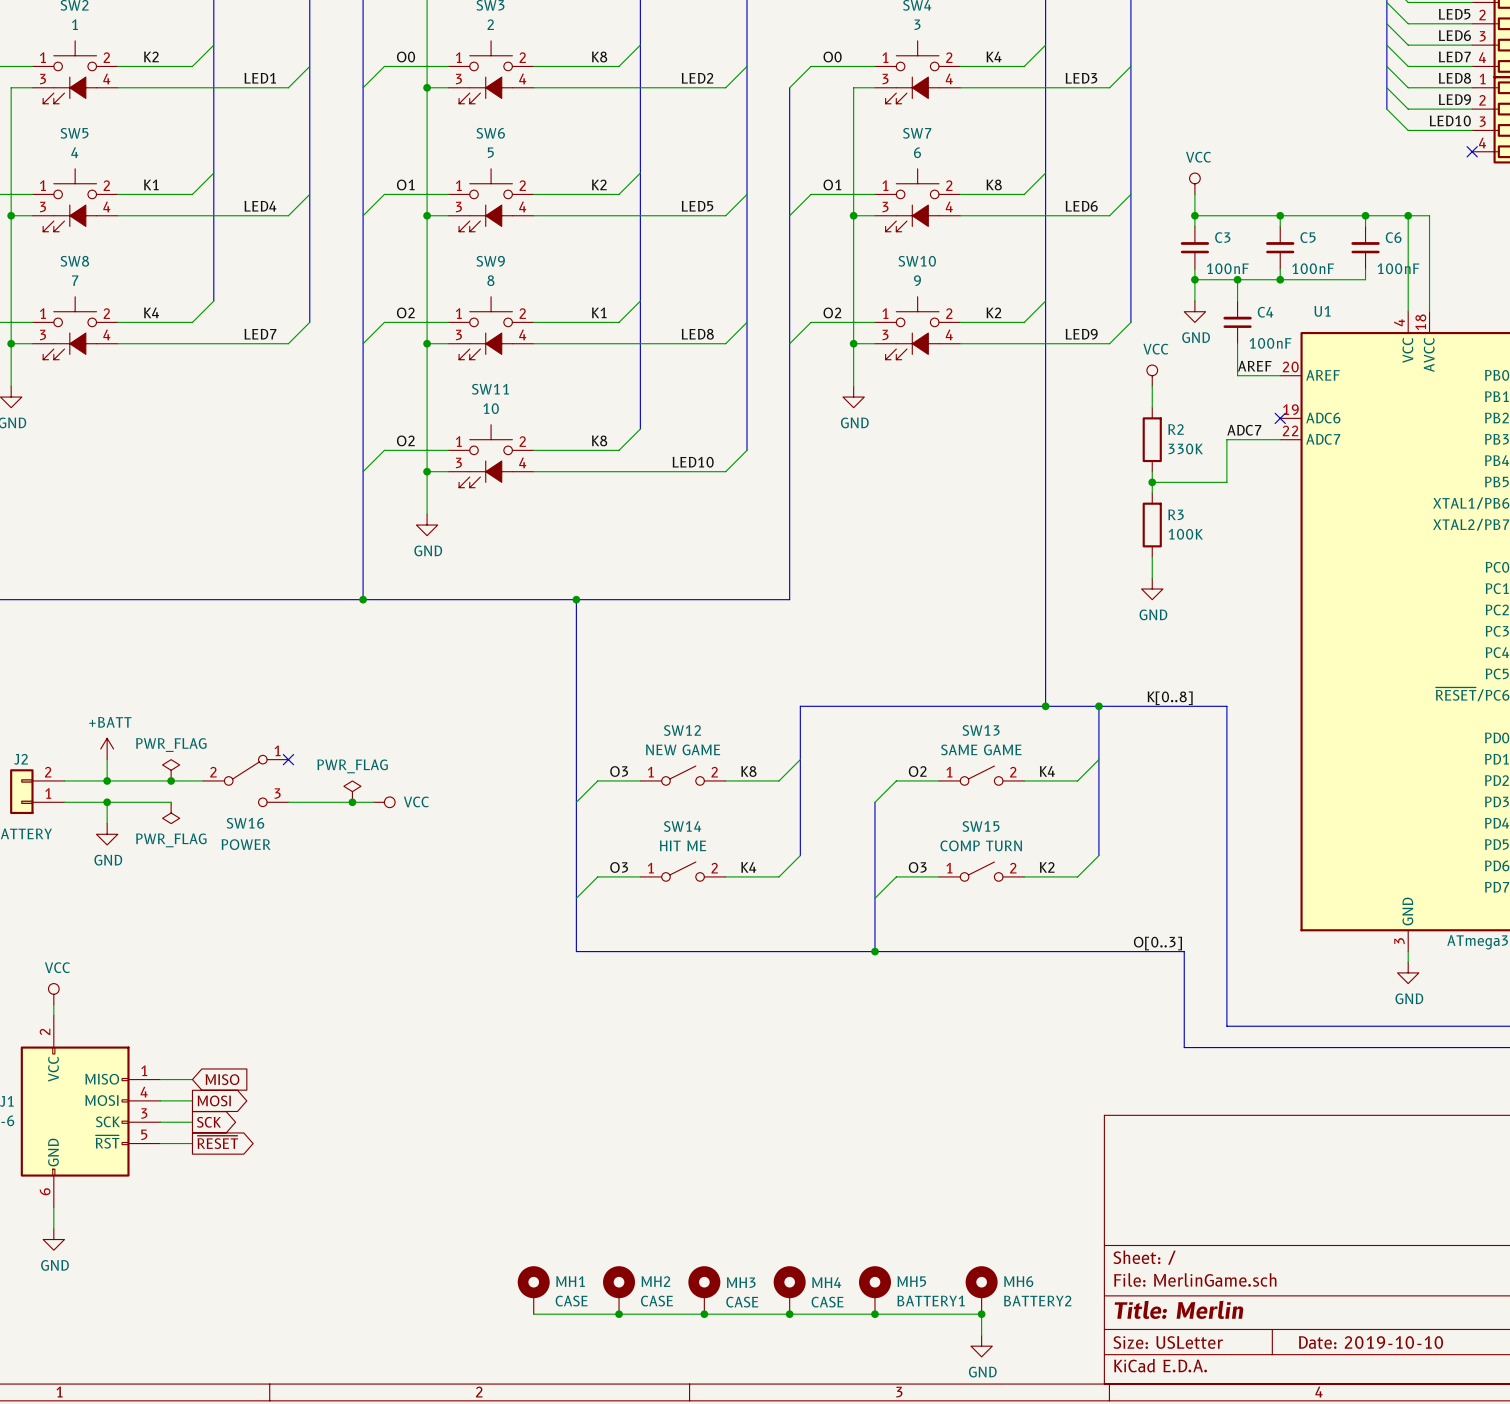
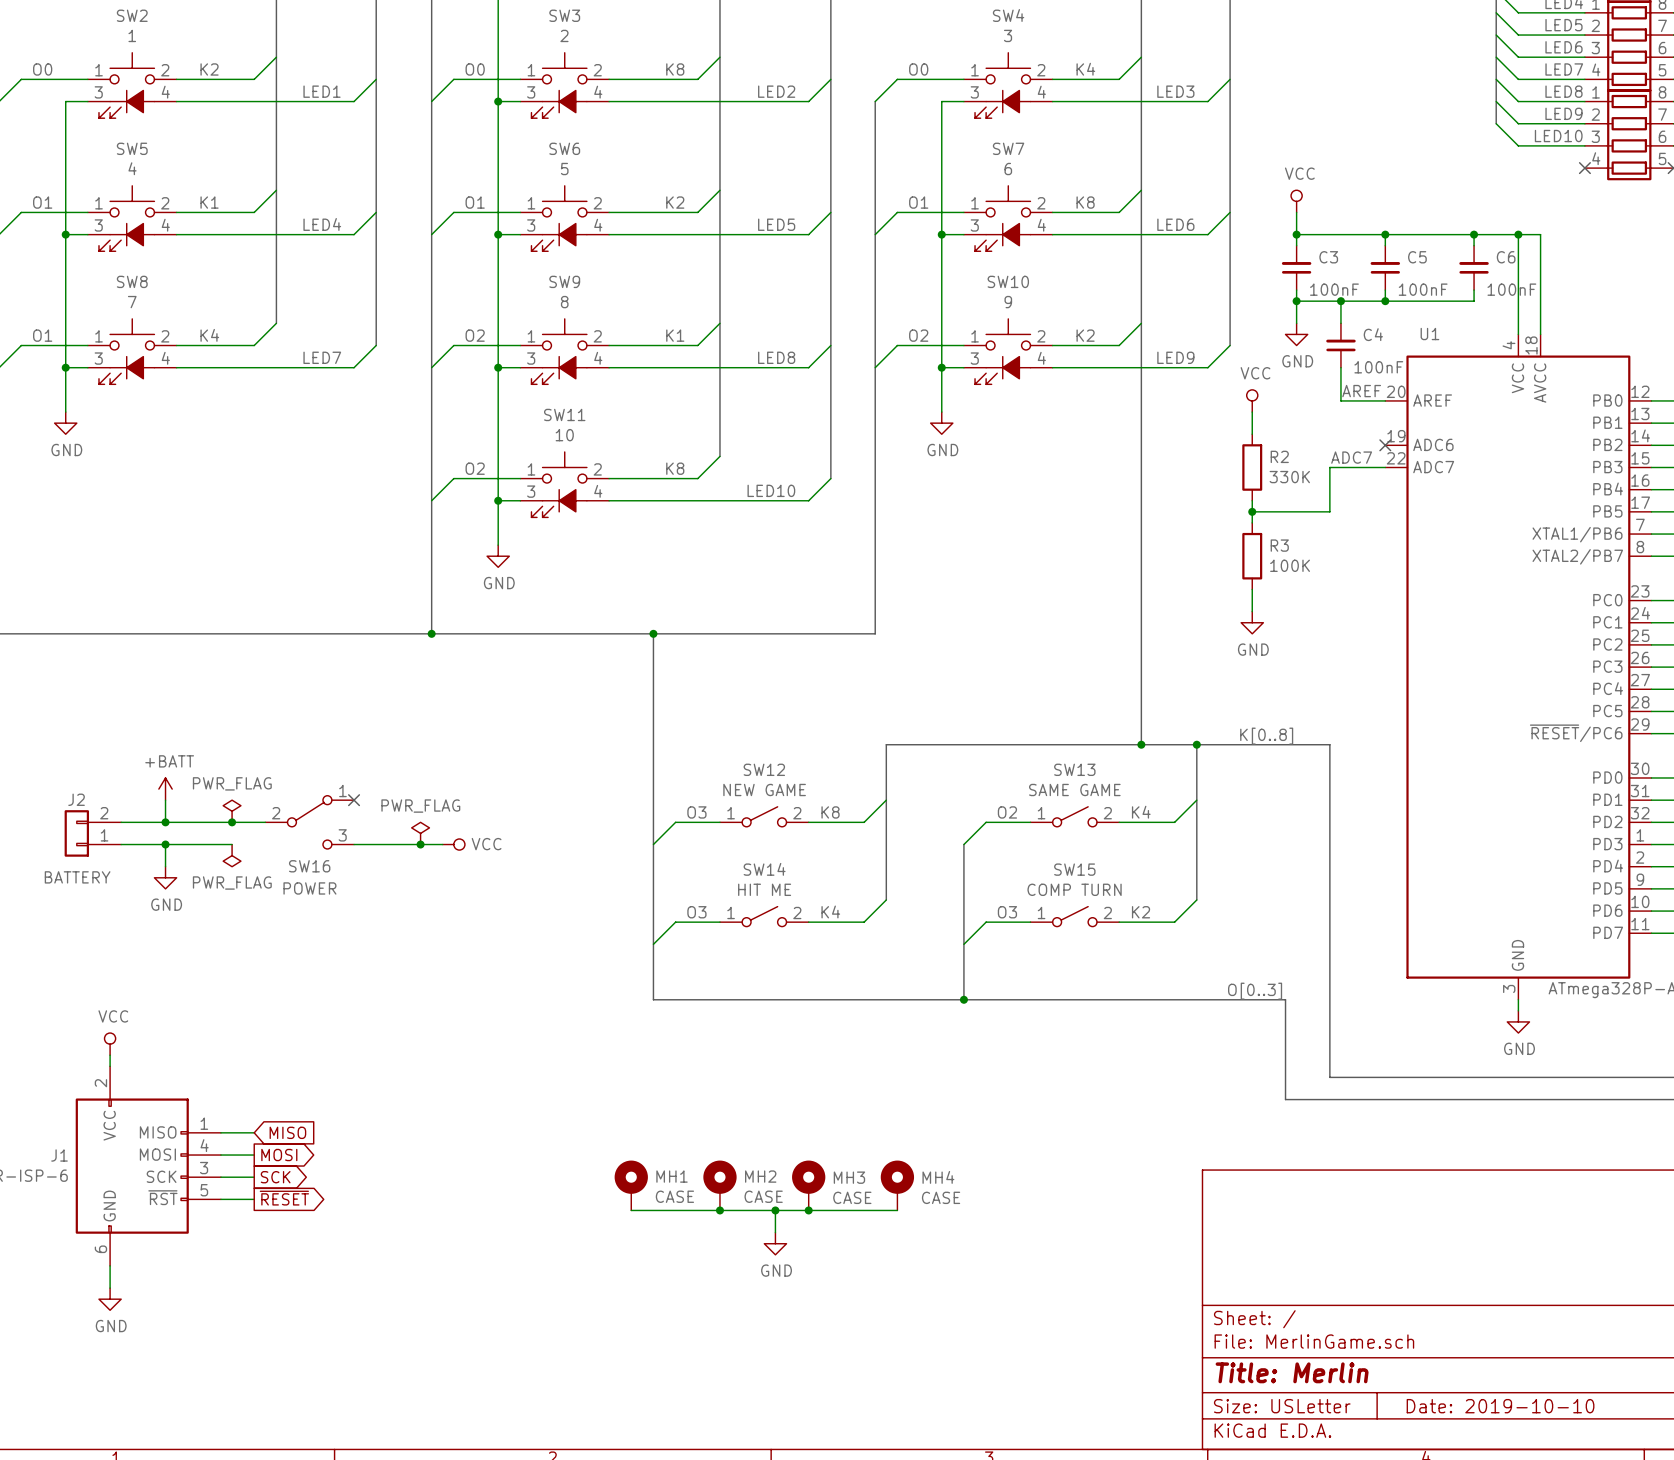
wire: none -> (631, 1210) (897, 1210)
junction: none -> (719, 1210)
wire: none -> (775, 1210) (775, 1232)
junction: none -> (775, 1210)
junction: none -> (808, 1210)
power symbol: none -> GND (775, 1243)
MH1 position: (533, 1290) -> (631, 1185)
MH2 position: (619, 1290) -> (719, 1185)
MH3 position: (704, 1290) -> (808, 1185)
MH4 position: (789, 1290) -> (897, 1185)
MH5: BATTERY1 (874, 1290) -> none
MH6: BATTERY2 (981, 1290) -> none
wire: (533, 1314) (981, 1314) (981, 1335) -> none
junction: (619, 1314) -> none
junction: (704, 1314) -> none
junction: (789, 1314) -> none
junction: (874, 1314) -> none
junction: (981, 1314) -> none
power symbol: GND (981, 1346) -> none

